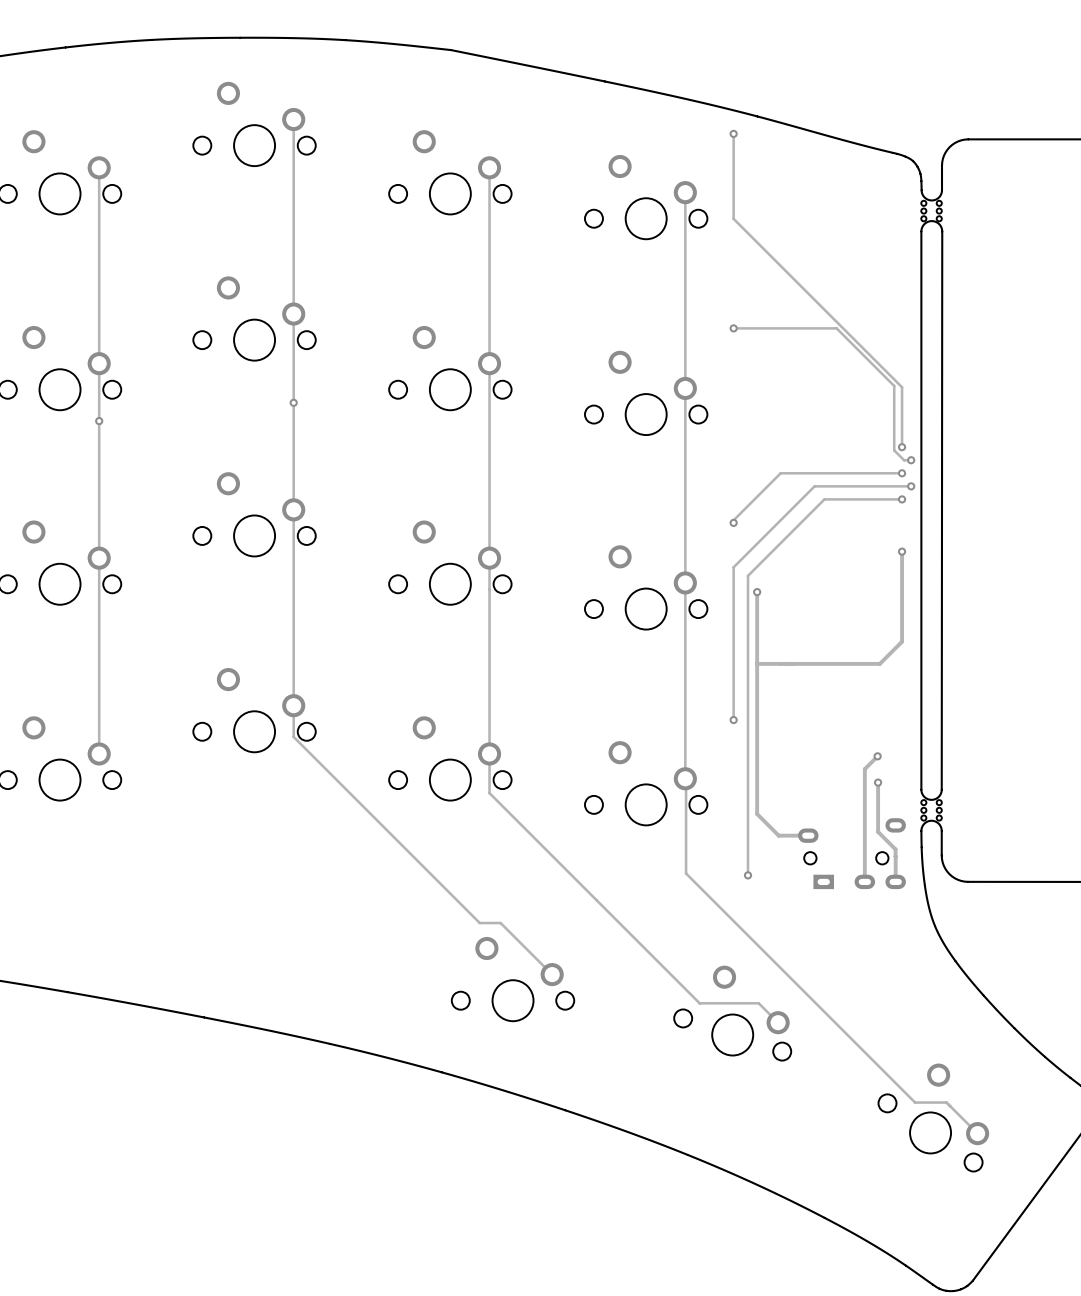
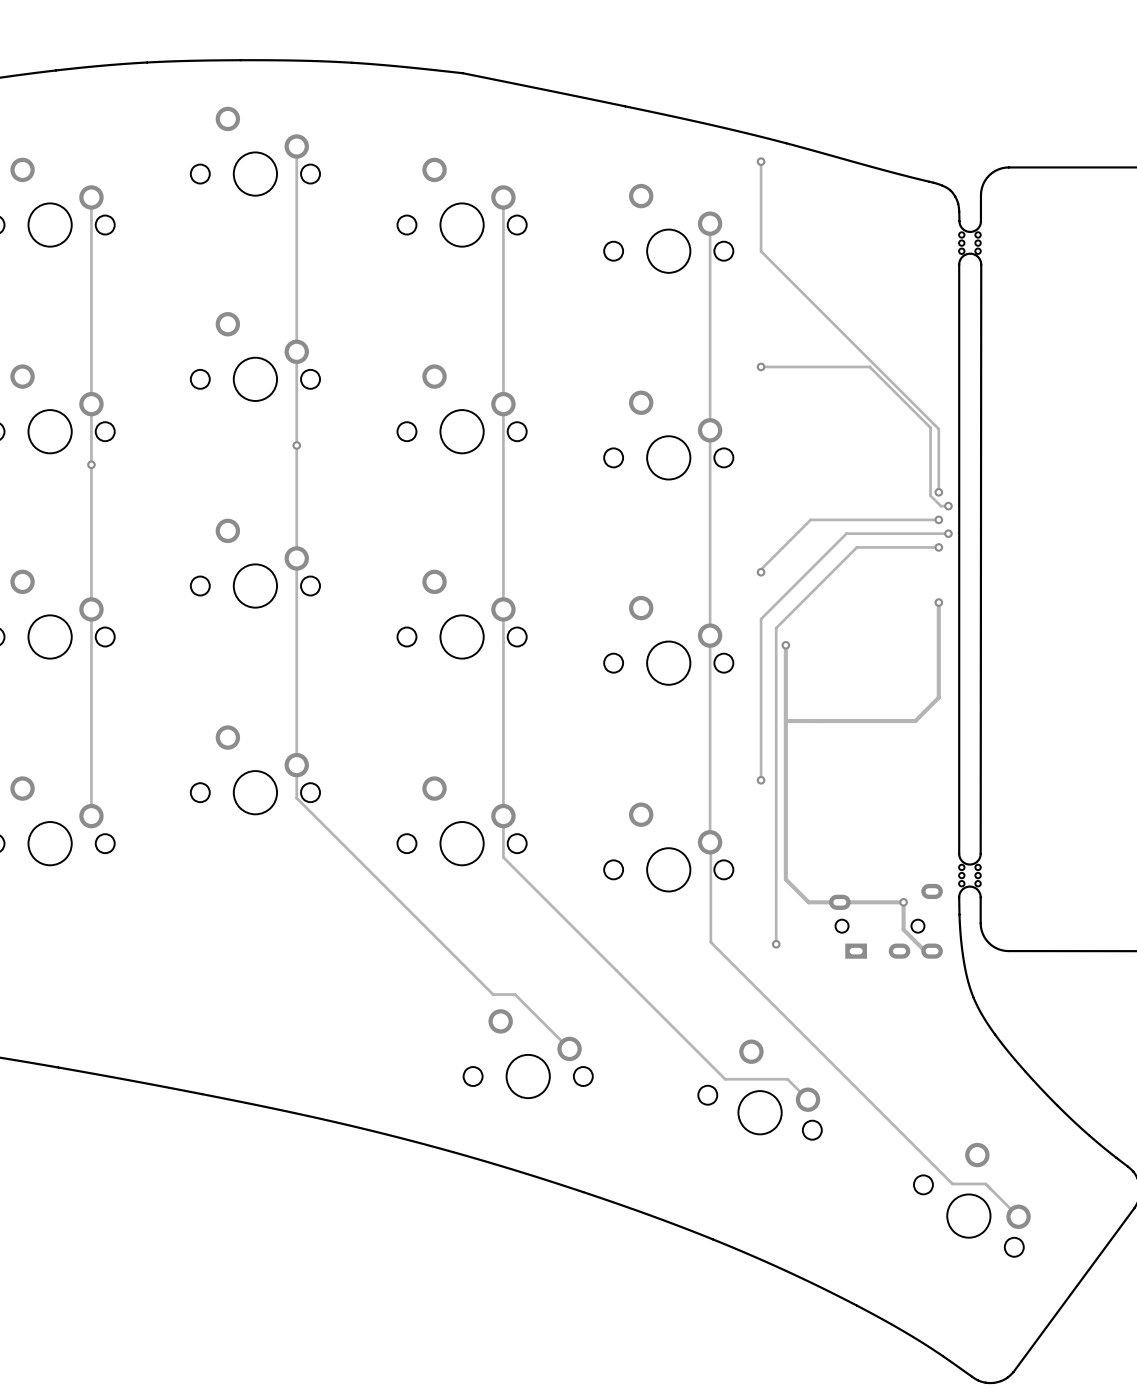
track: (877, 756) (864, 769) (864, 881) (868, 878) -> none
via: (877, 756) -> none
track: (878, 782) (878, 831) (895, 849) (895, 856) -> none
via: (878, 782) -> none
track: none -> (839, 902) (903, 902) (903, 929) (925, 951)
via: none -> (903, 902)
track: (895, 856) (895, 881) -> none

